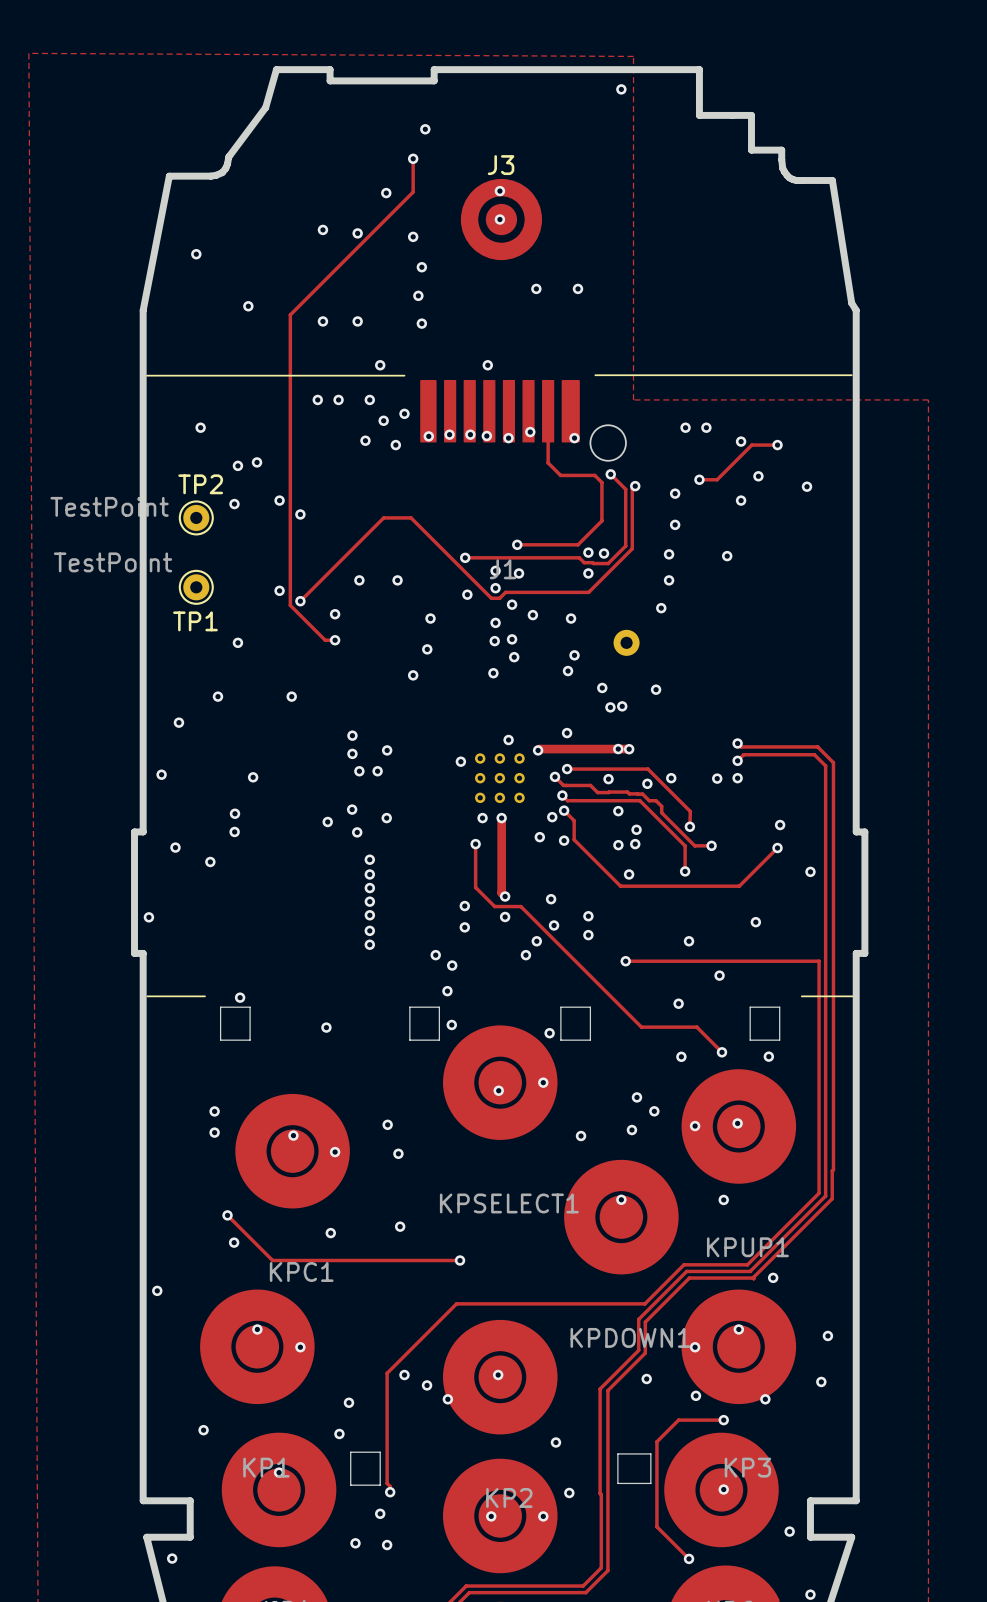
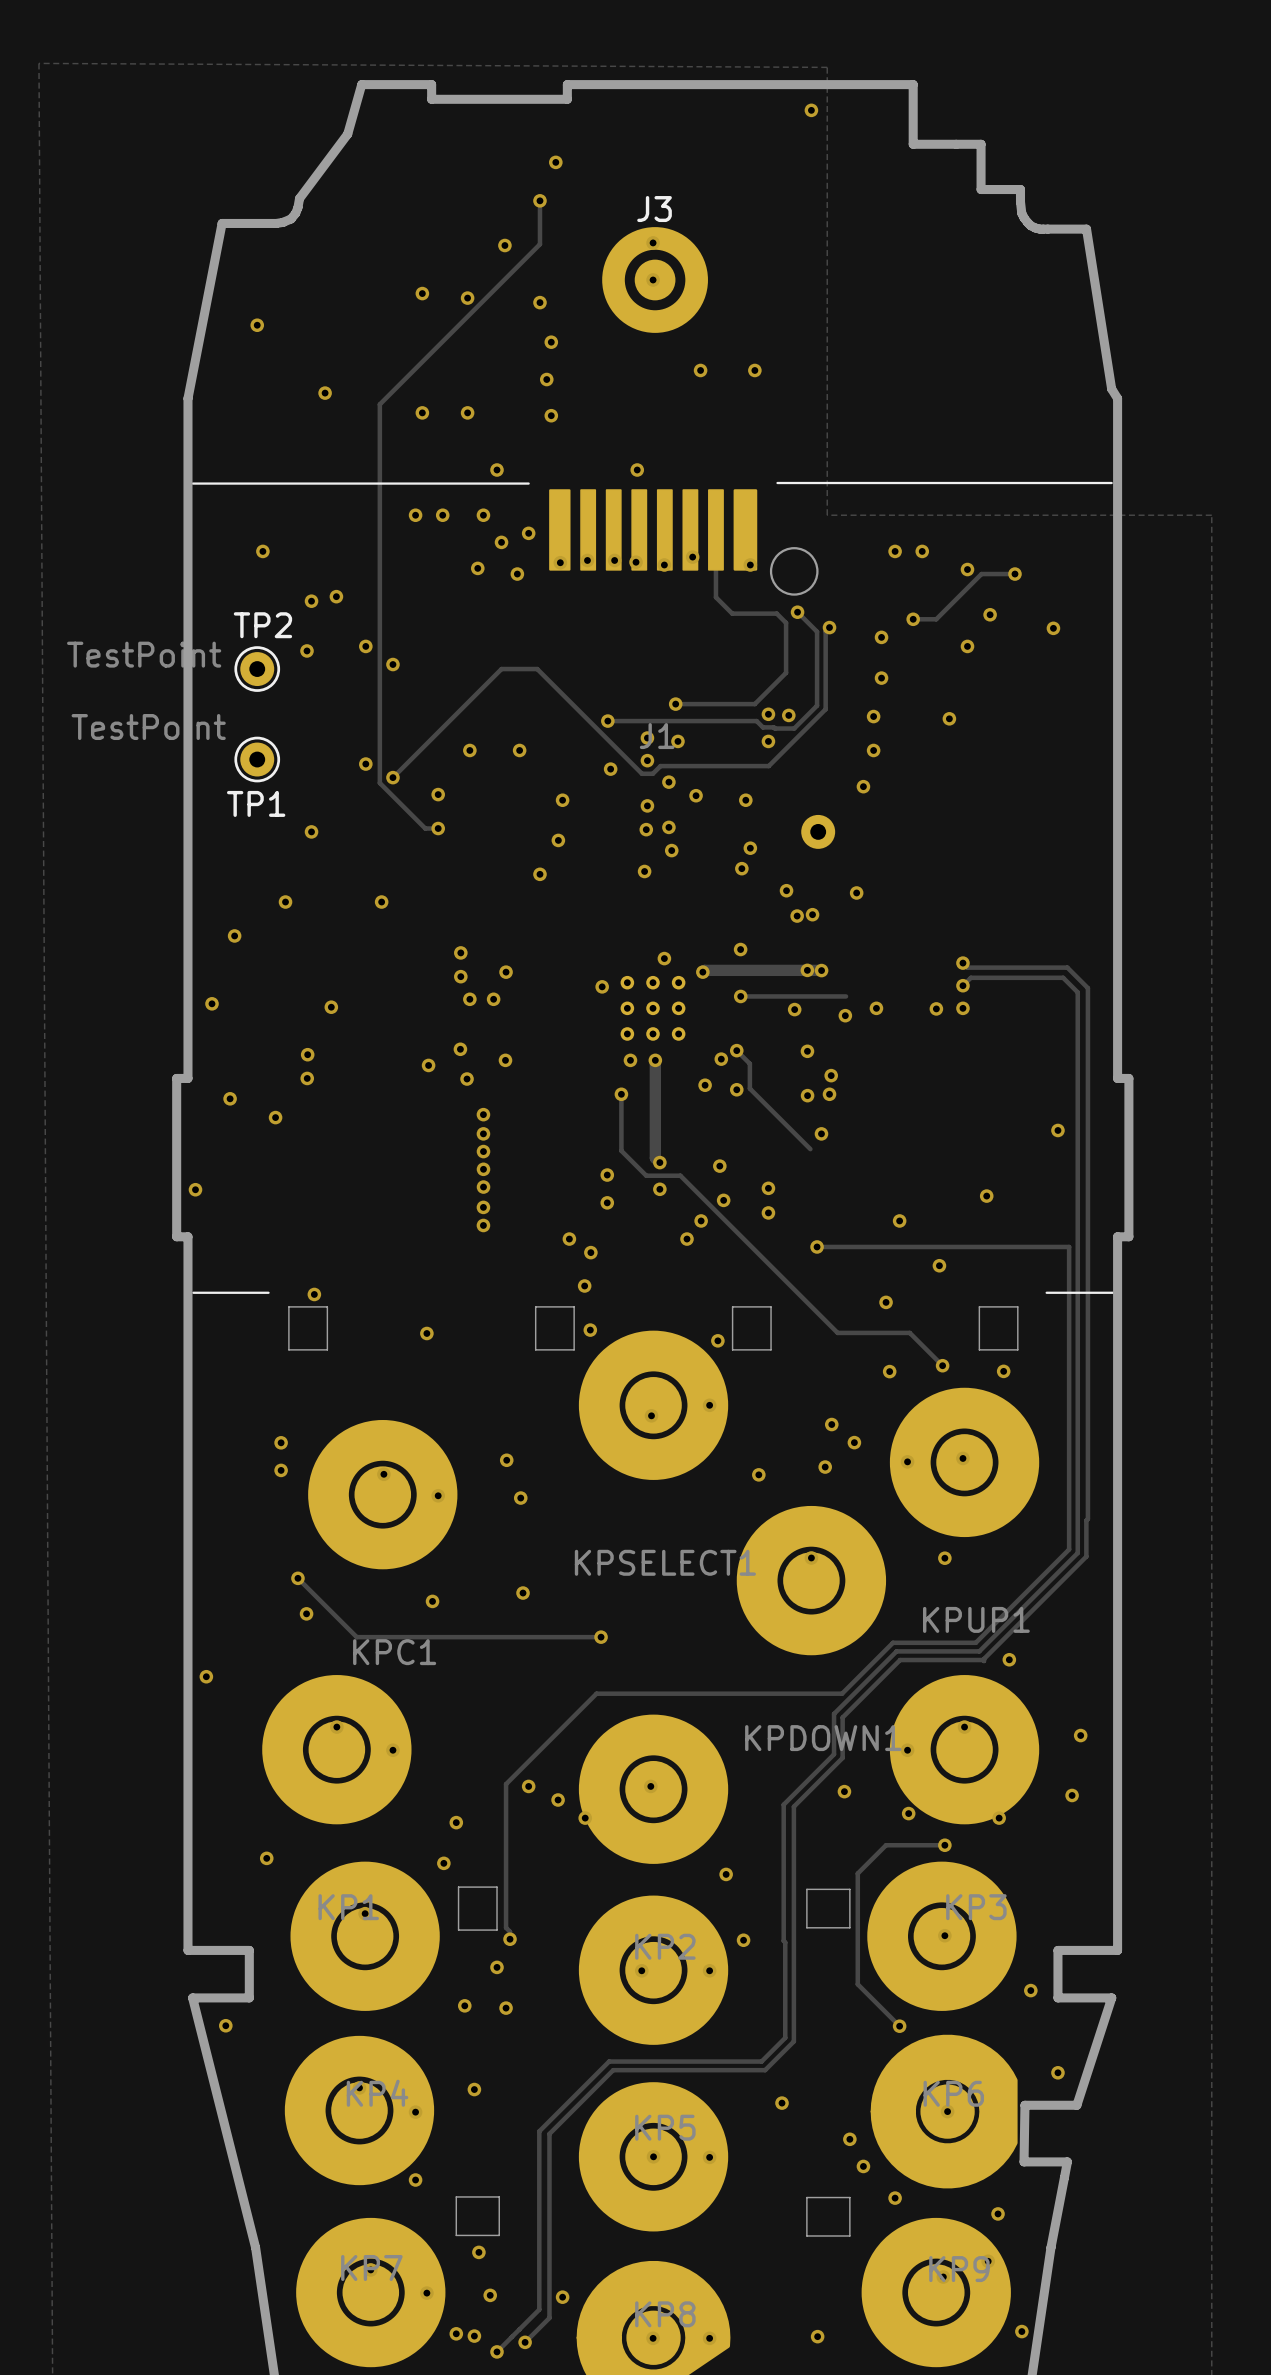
track: (647, 769) (690, 811) (689, 826) -> none
track: (555, 776) (563, 785) (590, 785) (597, 792) (637, 793) -> none
via: (555, 776) -> none
track: (637, 794) (642, 794) (649, 800) (656, 800) (661, 806) (661, 812) (694, 845) (711, 845) -> none
track: (562, 795) (567, 800) (639, 800) (685, 845) (685, 871) -> none
via: (562, 795) -> none
via: (780, 825) -> none
via: (689, 826) -> none
via: (711, 845) -> none
track: (777, 848) (739, 886) (620, 886) -> none
via: (777, 848) -> none
via: (685, 871) -> none

